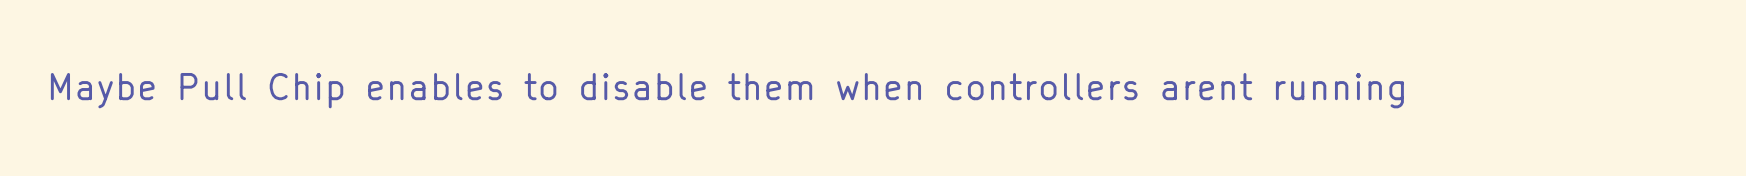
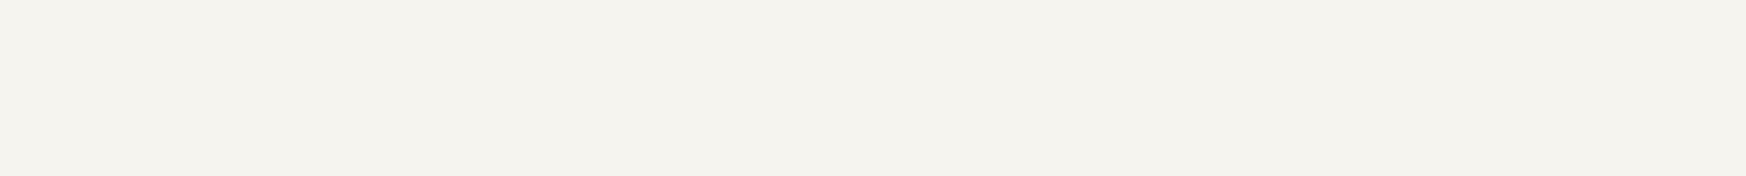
text: Maybe Pull Chip enables to disable them when controllers arent running (727, 90) -> none

